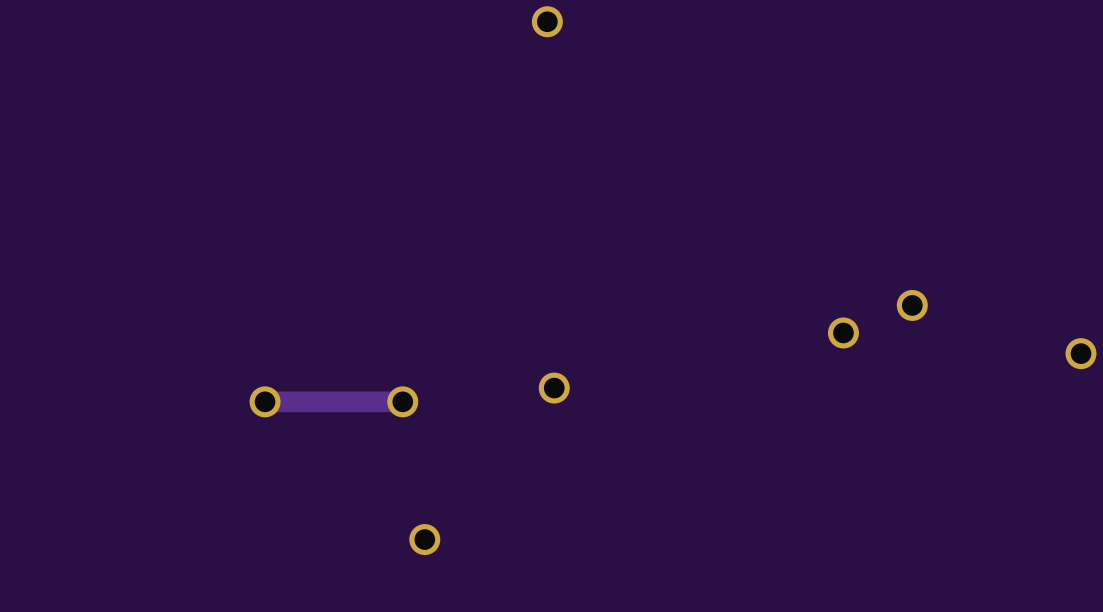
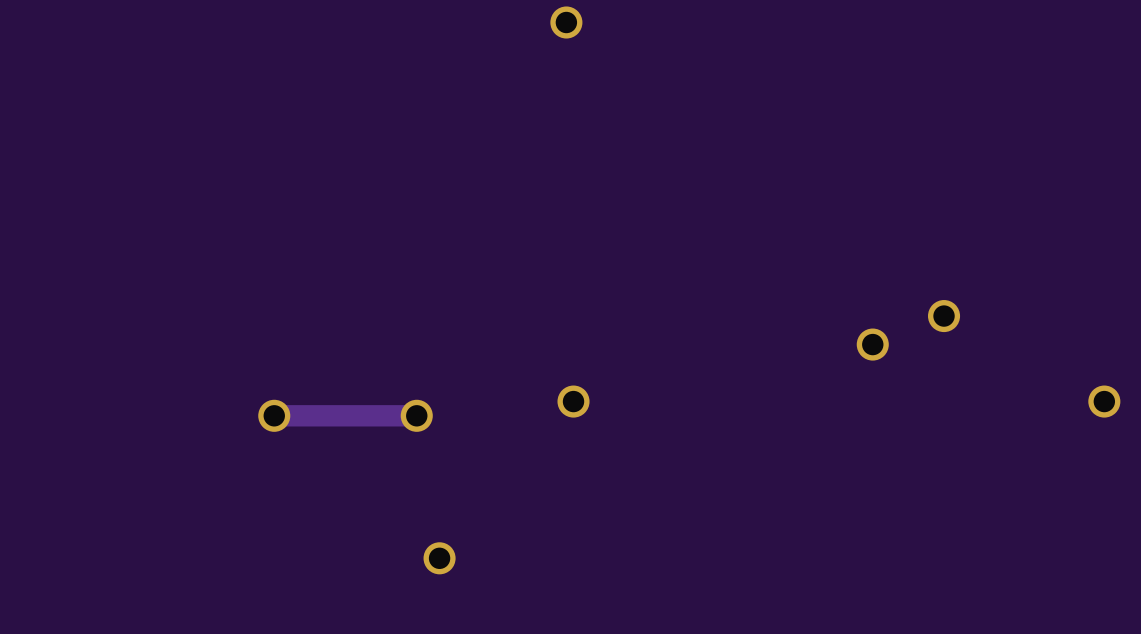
via position: (1081, 353) -> (1104, 401)

